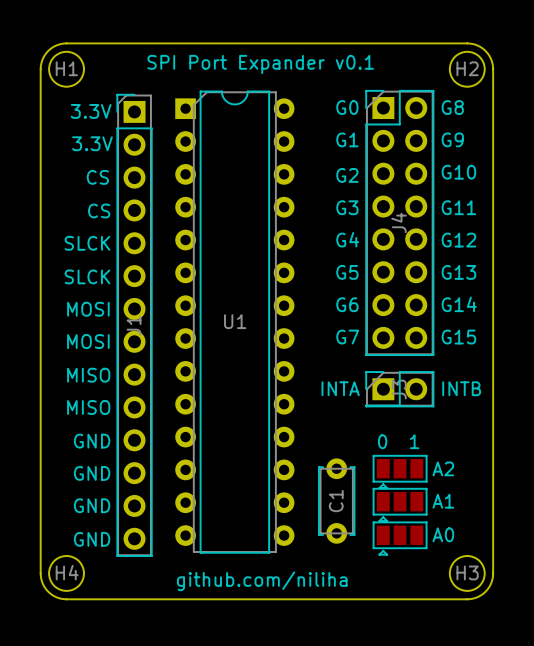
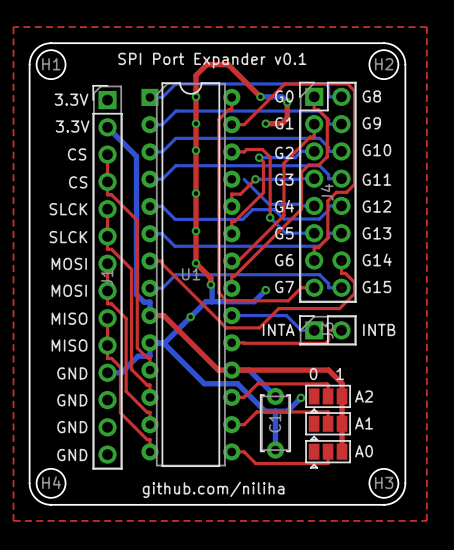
top zone outline: none -> (13, 27) (426, 27) (426, 520) (13, 520) (13, 27)
via: none -> (196, 96)
top track: none -> (231, 97) (231, 109) (228, 109) (218, 119) (218, 292) (226, 300) (288, 300) (301, 287) (314, 287)
top track: none -> (260, 96) (228, 64) (206, 64) (196, 75) (196, 263) (210, 278) (210, 284)
bottom track: none -> (260, 96) (281, 96) (287, 102)
via: none -> (260, 96)
top track: none -> (314, 96) (314, 109) (318, 109) (327, 118) (327, 156) (318, 165) (308, 165) (301, 172) (301, 209) (234, 275) (231, 275) (231, 288)
bottom track: none -> (341, 96) (328, 96) (328, 86) (325, 83) (175, 83) (162, 97) (149, 97)
top track: none -> (287, 102) (287, 118) (281, 123) (265, 123)
via: none -> (287, 102)
via: none -> (196, 123)
via: none -> (265, 123)
top track: none -> (314, 124) (314, 137) (310, 137) (283, 163) (283, 215) (238, 261) (231, 261)
bottom track: none -> (341, 124) (328, 124) (328, 120) (319, 111) (175, 111) (162, 124) (149, 124)
top track: none -> (231, 124) (244, 124) (284, 83) (347, 83) (354, 90) (354, 184) (346, 192) (336, 192) (327, 200) (327, 237) (318, 247) (314, 247) (314, 260)
bottom track: none -> (107, 127) (136, 156) (136, 294) (144, 302) (149, 302) (149, 315)
via: none -> (196, 150)
bottom track: none -> (314, 151) (301, 151) (295, 157) (259, 157)
bottom track: none -> (341, 151) (328, 151) (328, 147) (319, 138) (175, 138) (162, 151) (149, 151)
top track: none -> (231, 151) (262, 149) (270, 157) (270, 217)
top track: none -> (107, 154) (107, 194) (111, 194) (137, 220) (137, 347) (147, 357) (149, 357) (149, 370)
top track: none -> (259, 157) (263, 162) (263, 192) (234, 221) (231, 221) (231, 233)
via: none -> (259, 157)
bottom track: none -> (314, 178) (255, 179)
bottom track: none -> (341, 178) (328, 178) (328, 174) (319, 165) (175, 165) (162, 179) (149, 179)
bottom track: none -> (244, 179) (269, 204) (314, 205)
top track: none -> (255, 179) (240, 194) (231, 194) (231, 206)
via: none -> (255, 179)
via: none -> (196, 193)
bottom track: none -> (341, 205) (328, 205) (328, 209) (319, 219) (283, 219) (274, 209) (252, 209) (242, 219) (175, 219) (162, 206) (149, 206)
top track: none -> (107, 209) (107, 249) (111, 249) (131, 269) (131, 369) (147, 384) (149, 384) (149, 397)
bottom track: none -> (270, 217) (285, 233) (314, 233)
via: none -> (270, 217)
via: none -> (196, 231)
bottom track: none -> (341, 233) (328, 233) (328, 237) (319, 246) (174, 246) (162, 233) (149, 233)
top track: none -> (341, 260) (341, 273) (345, 273) (354, 282) (354, 293) (339, 308) (278, 308) (259, 327) (226, 327) (162, 263) (162, 261) (149, 261)
top track: none -> (107, 263) (107, 303) (111, 303) (126, 318) (126, 391) (147, 412) (149, 412) (149, 424)
via: none -> (196, 263)
bottom track: none -> (210, 284) (212, 301)
via: none -> (210, 284)
bottom track: none -> (341, 287) (328, 287) (328, 283) (319, 274) (175, 274) (162, 288) (149, 288)
bottom track: none -> (265, 290) (254, 301) (205, 301) (164, 342) (149, 342) (149, 356) (138, 356) (121, 372) (107, 372)
via: none -> (265, 290)
top track: none -> (149, 315) (163, 315) (218, 370) (328, 370) (342, 383) (342, 451)
bottom track: none -> (231, 315) (286, 315) (301, 330) (314, 330)
via: none -> (190, 316)
top track: none -> (107, 318) (107, 358) (111, 358) (120, 367) (120, 412) (147, 439) (149, 439) (149, 451)
top track: none -> (341, 330) (328, 330) (328, 340) (325, 343) (231, 342)
bottom track: none -> (163, 342) (204, 383) (237, 383) (265, 411) (287, 411) (300, 397)
bottom track: none -> (231, 370) (249, 370) (275, 396)
top track: none -> (328, 396) (327, 383) (257, 383) (244, 397) (231, 397)
via: none -> (300, 397)
bottom track: none -> (275, 411) (275, 450)
top track: none -> (328, 423) (328, 411) (256, 411) (244, 424) (231, 424)
top track: none -> (328, 451) (328, 463) (255, 463) (244, 451) (231, 451)

